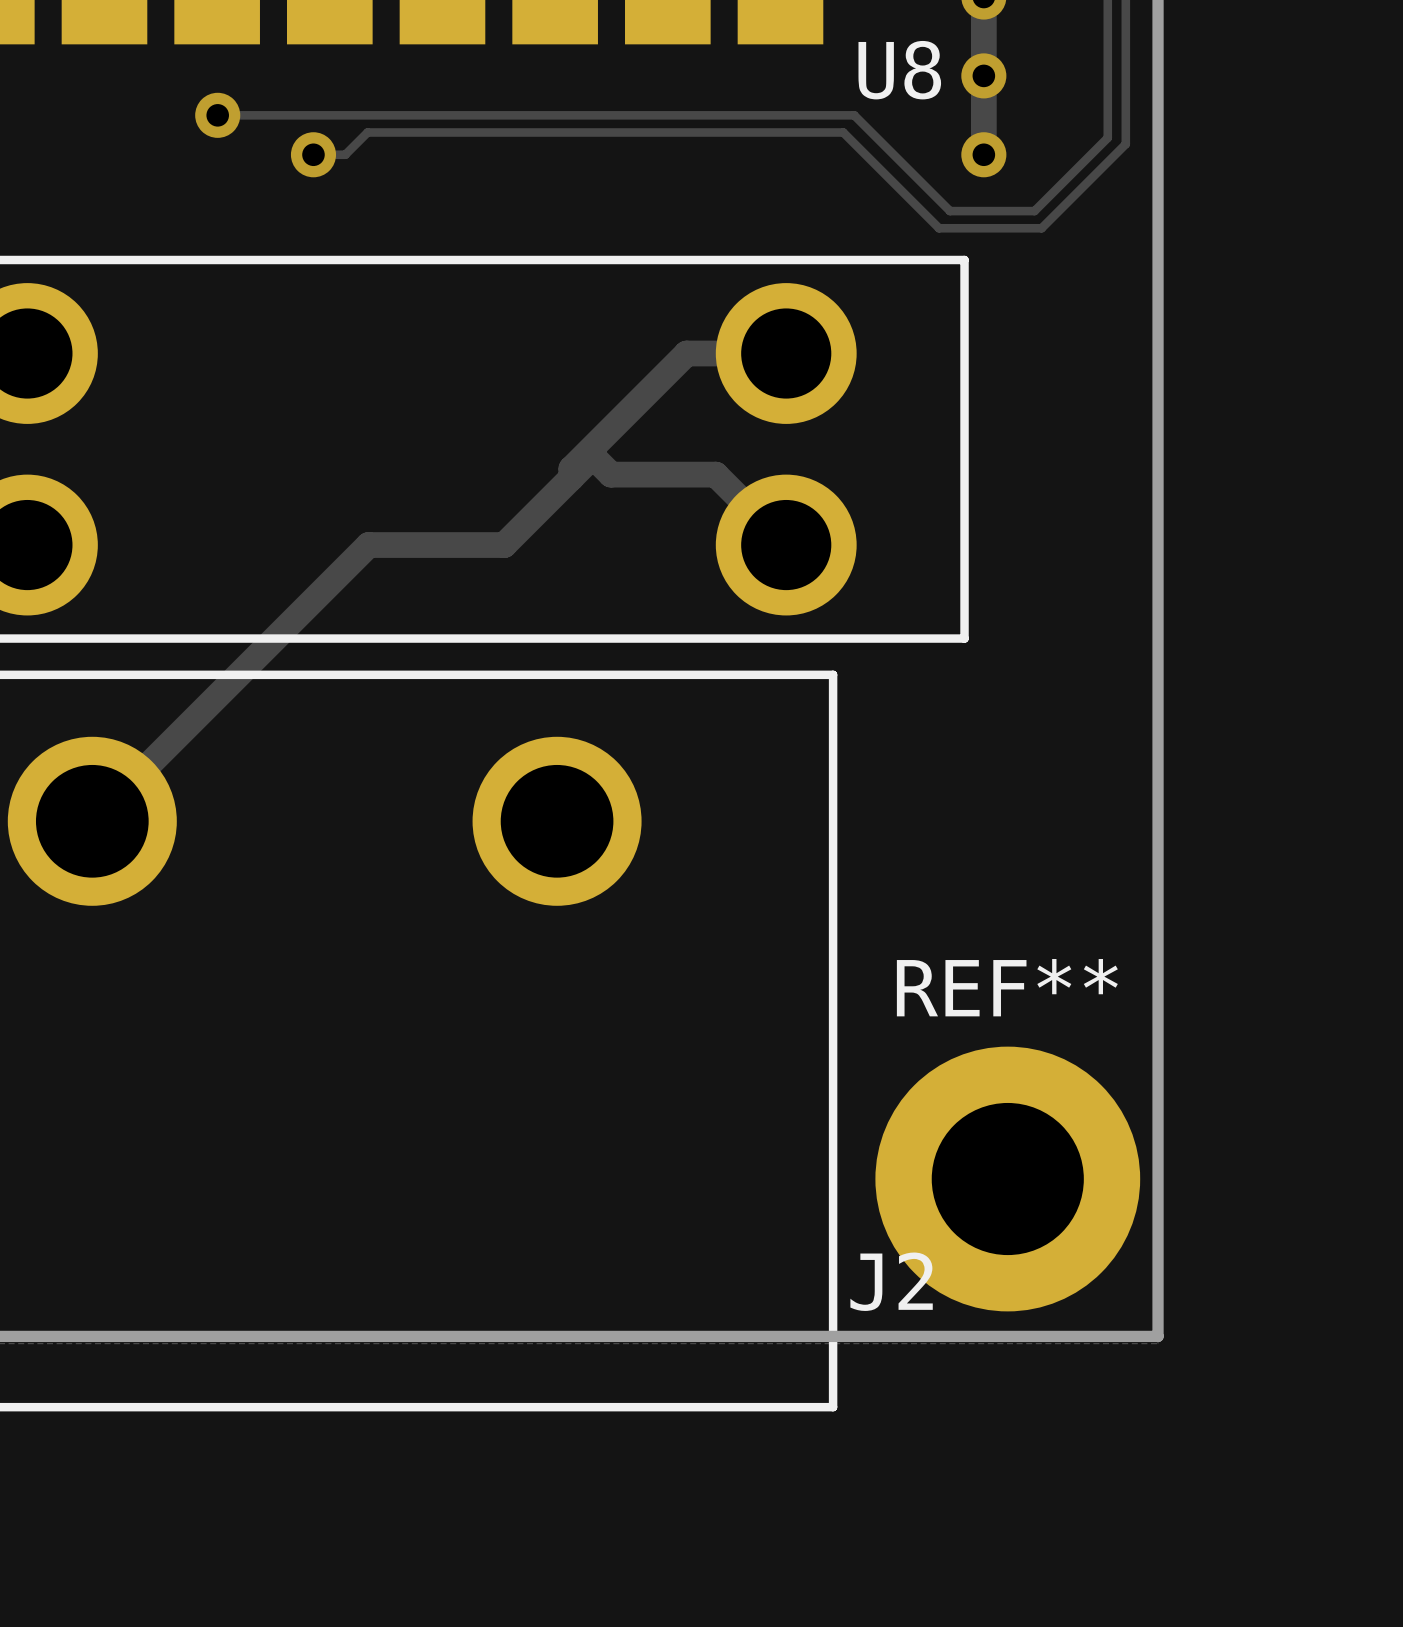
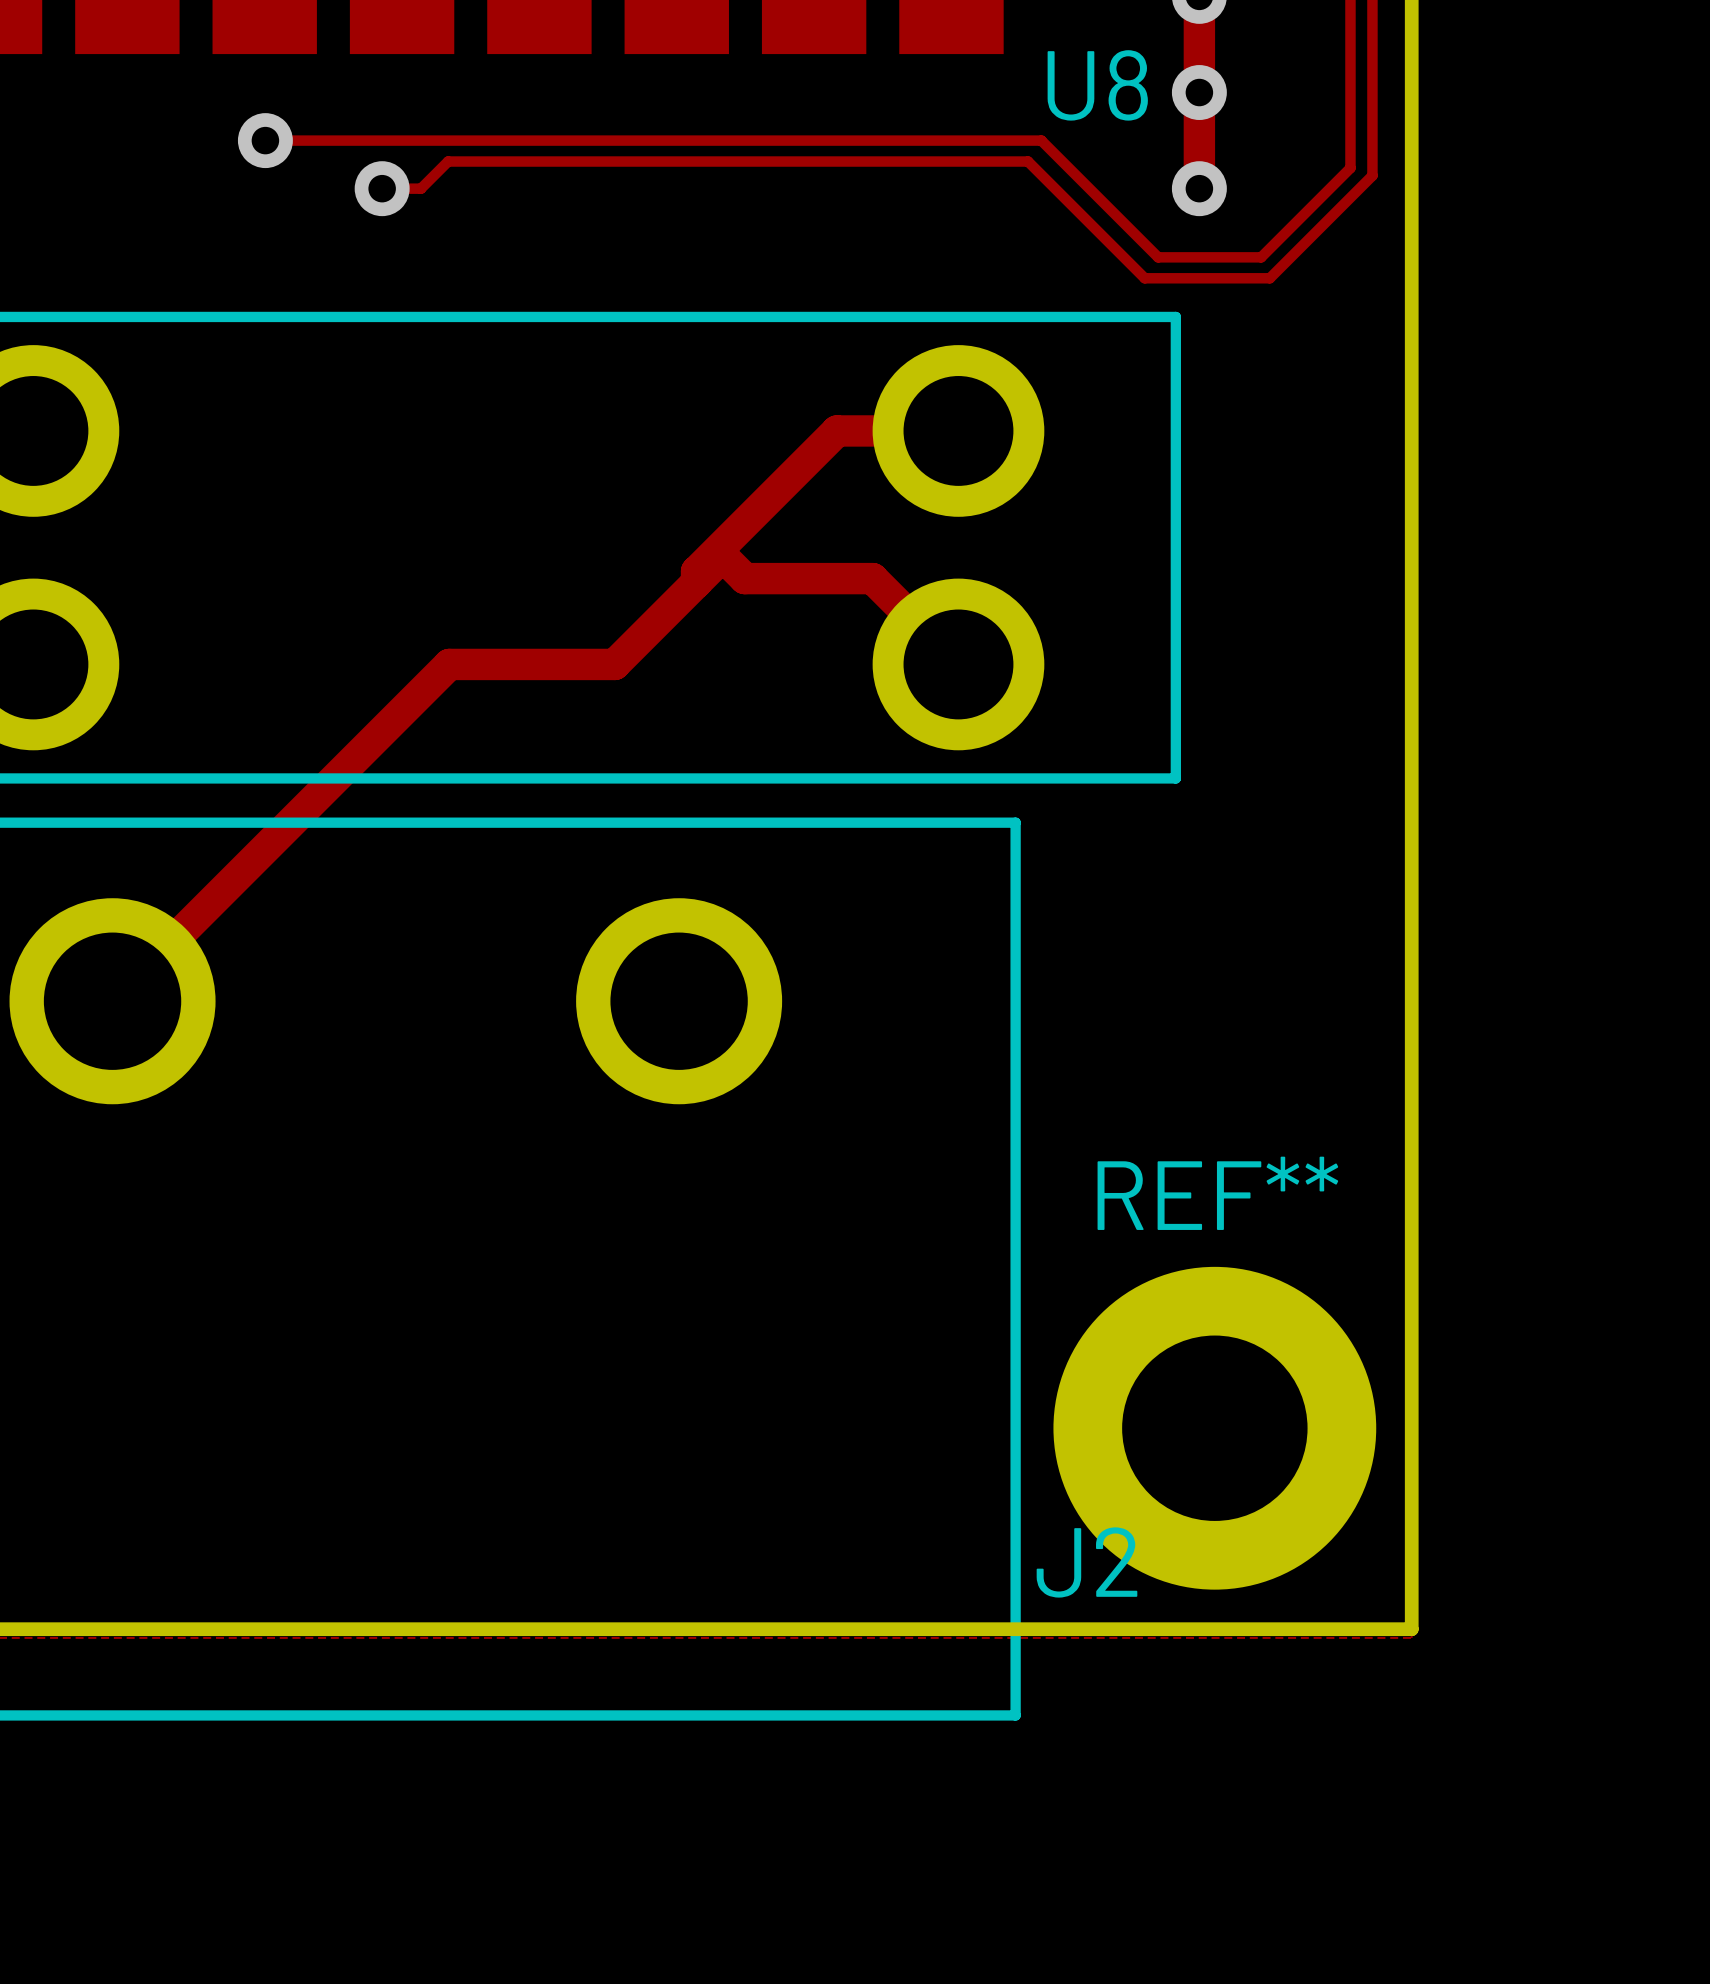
REF** position: (1007, 1179) -> (1214, 1428)

